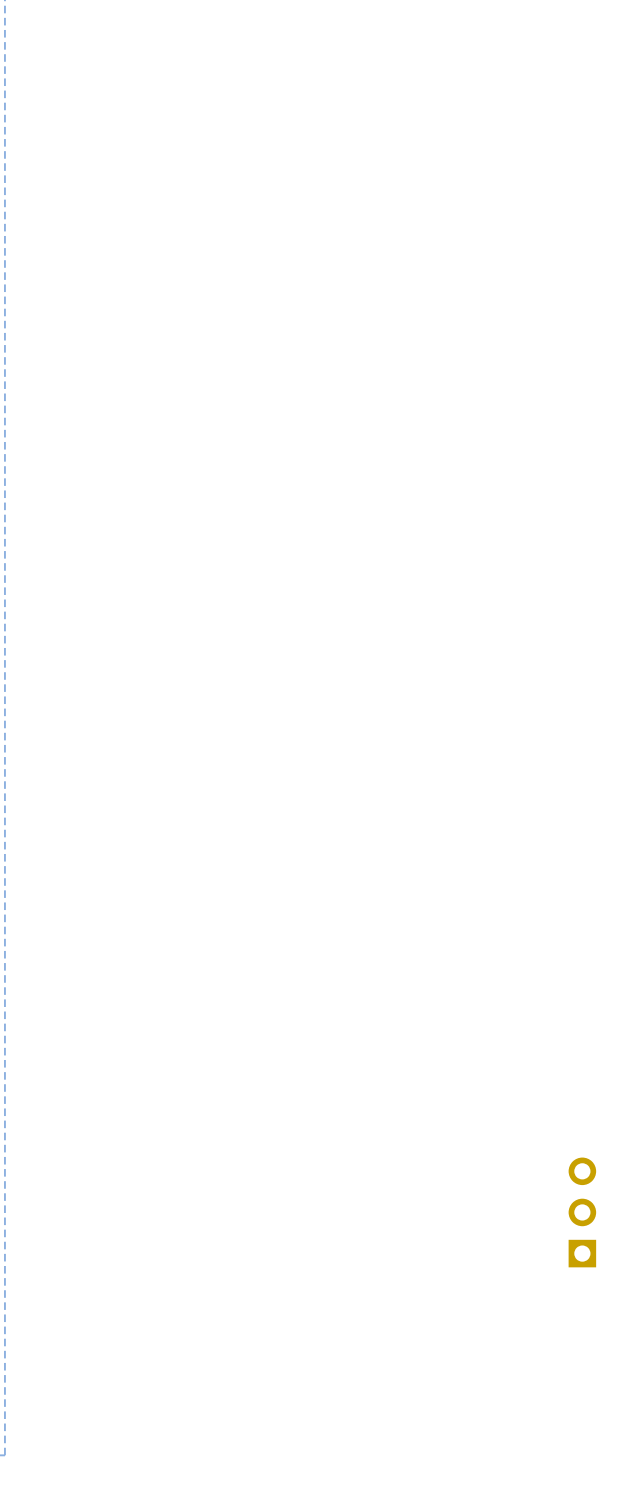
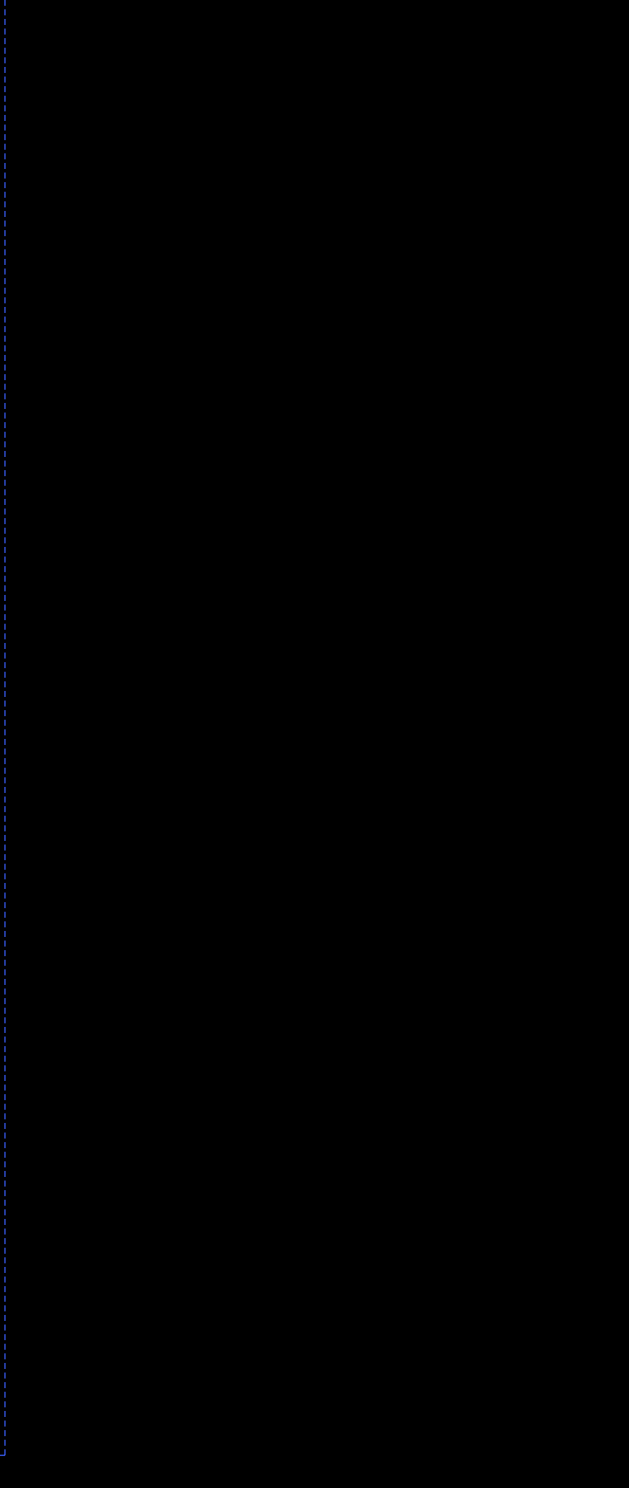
part: (582, 1212) -> none

